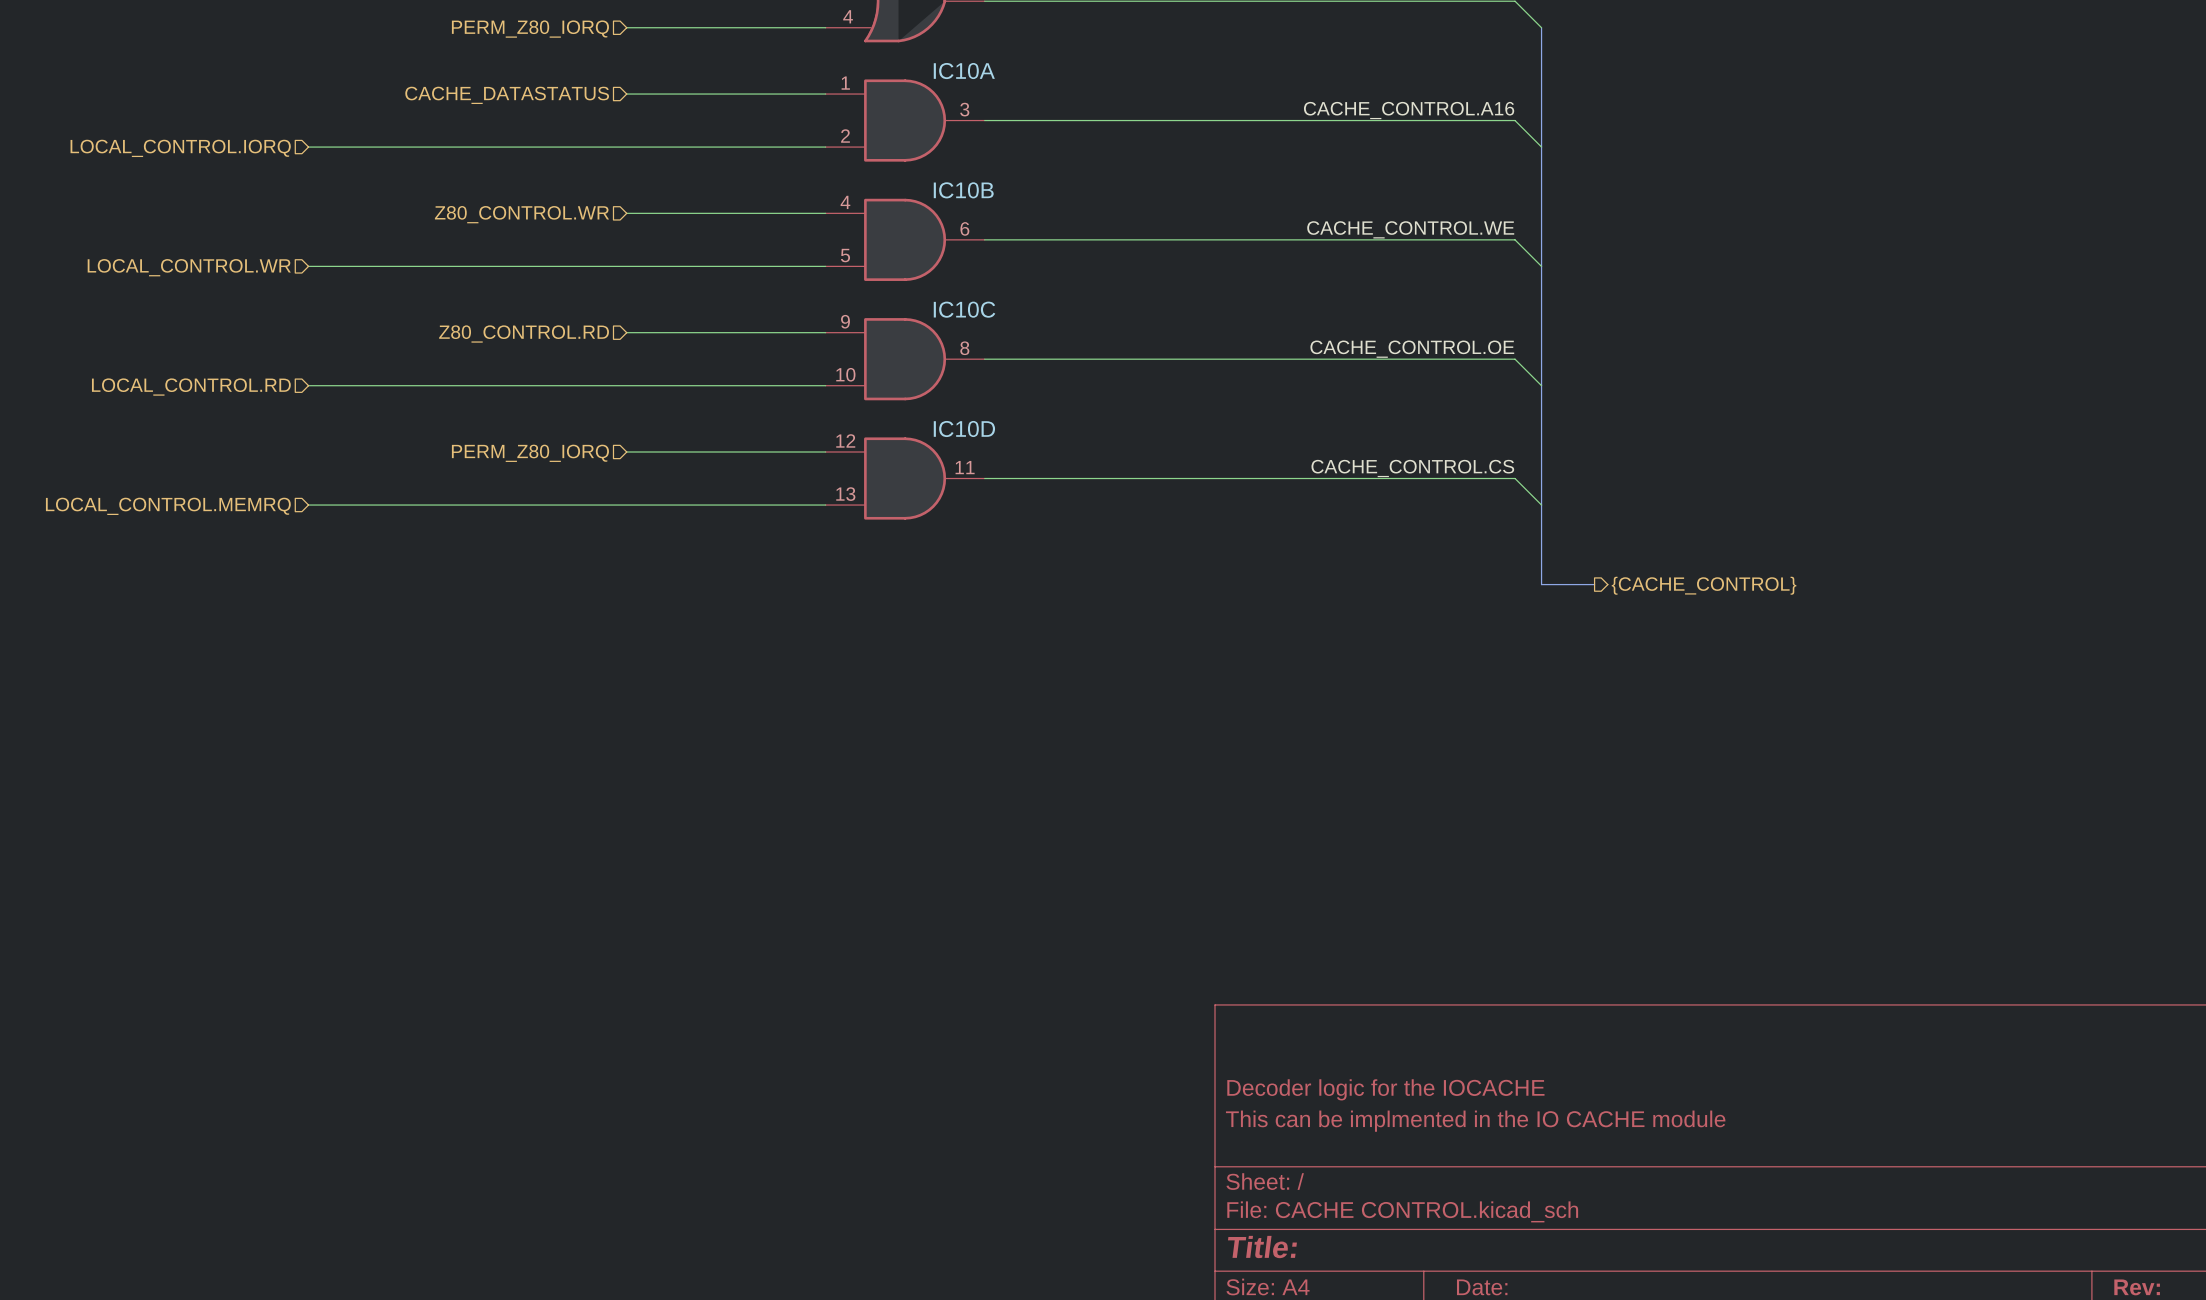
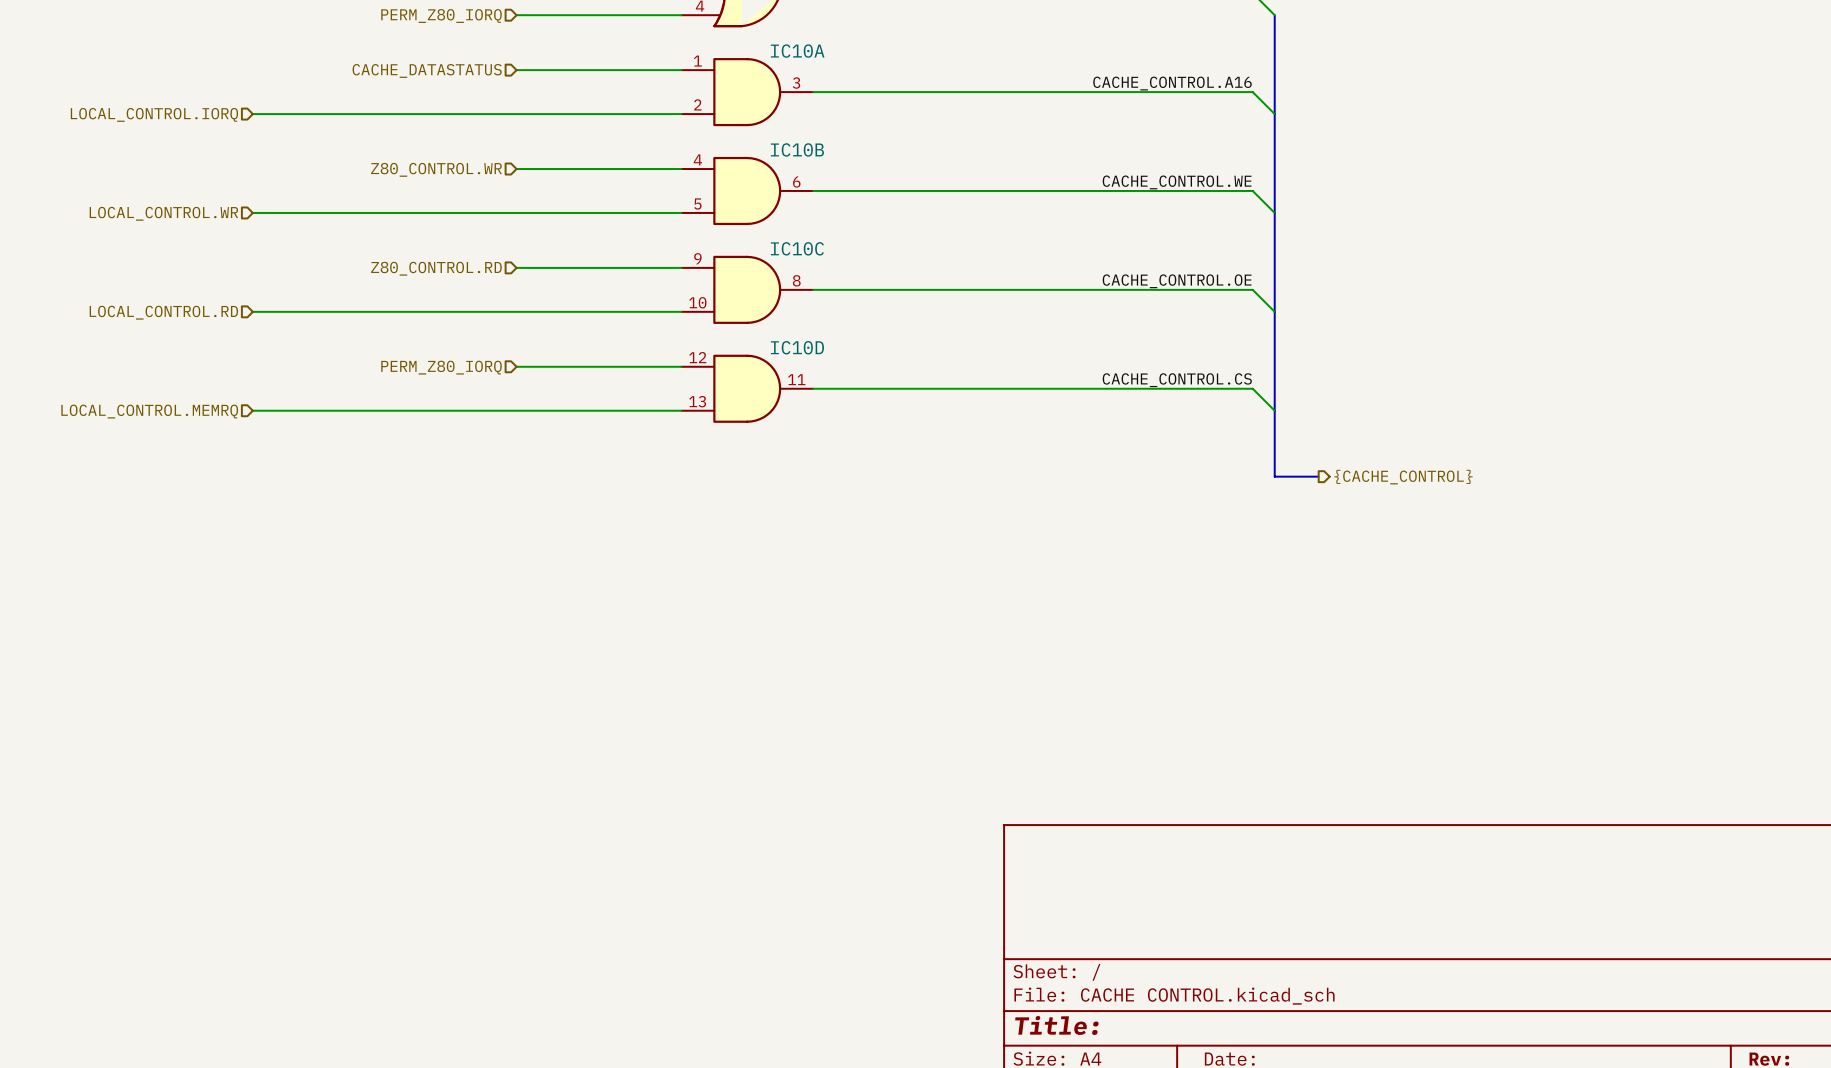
title block: Decoder logic for the IOCACHE (1385, 1089) -> none
title block: This can be implmented in the IO CACHE module (1475, 1121) -> none

